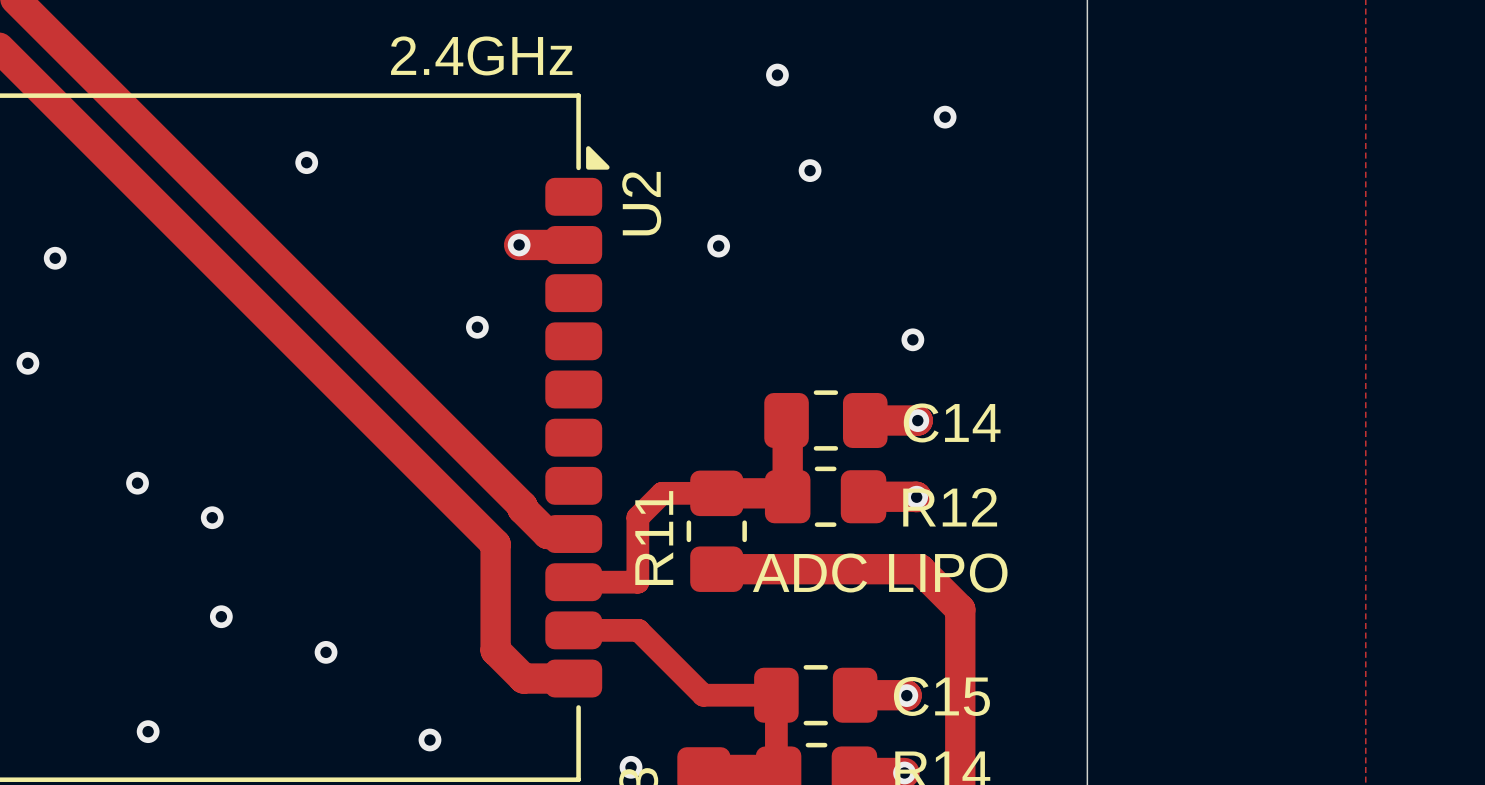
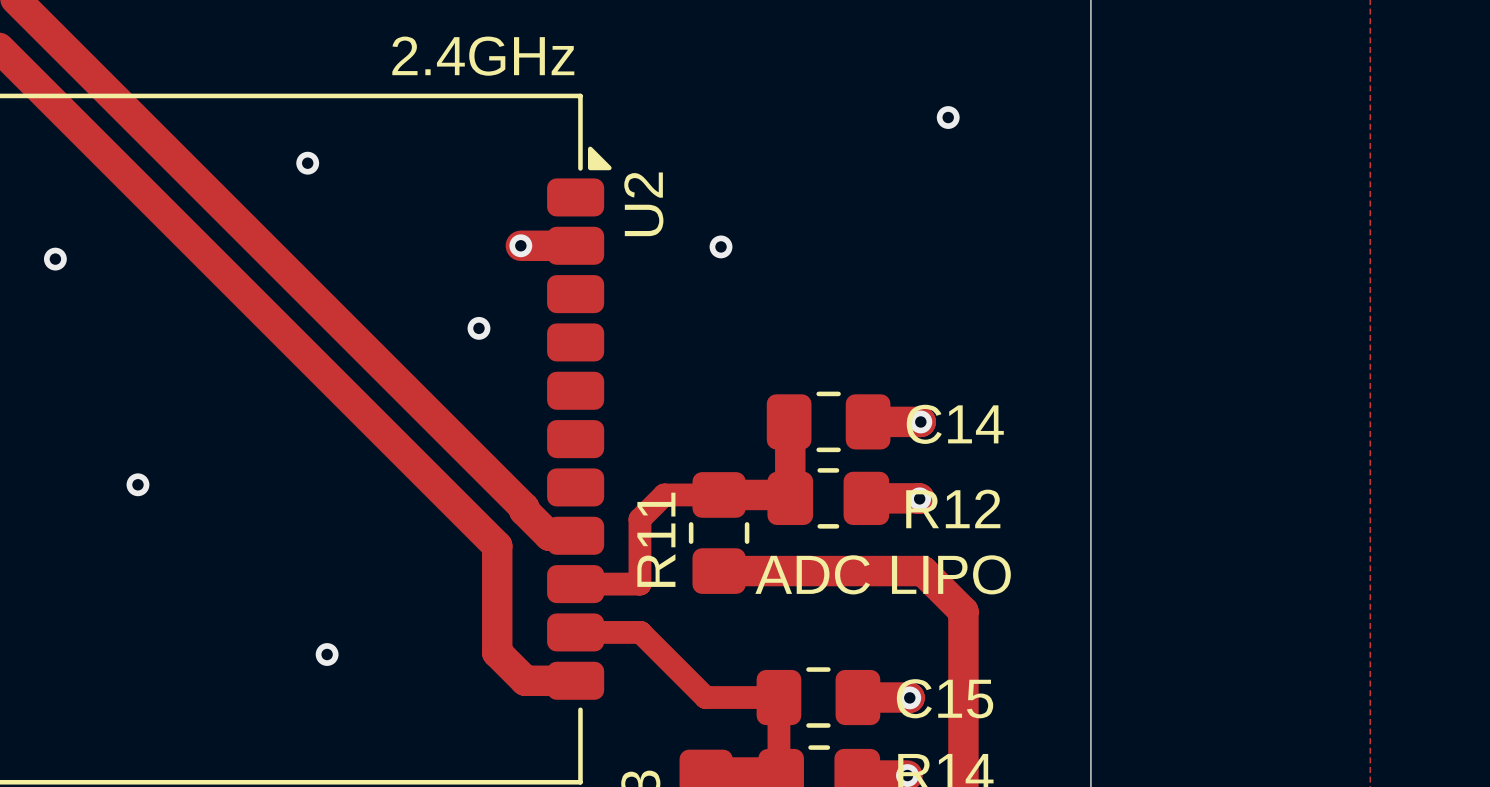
via: (777, 75) -> none
via: (810, 170) -> none
via: (912, 339) -> none
via: (27, 363) -> none
via: (212, 517) -> none
via: (221, 616) -> none
via: (148, 731) -> none
via: (429, 739) -> none
via: (631, 767) -> none

